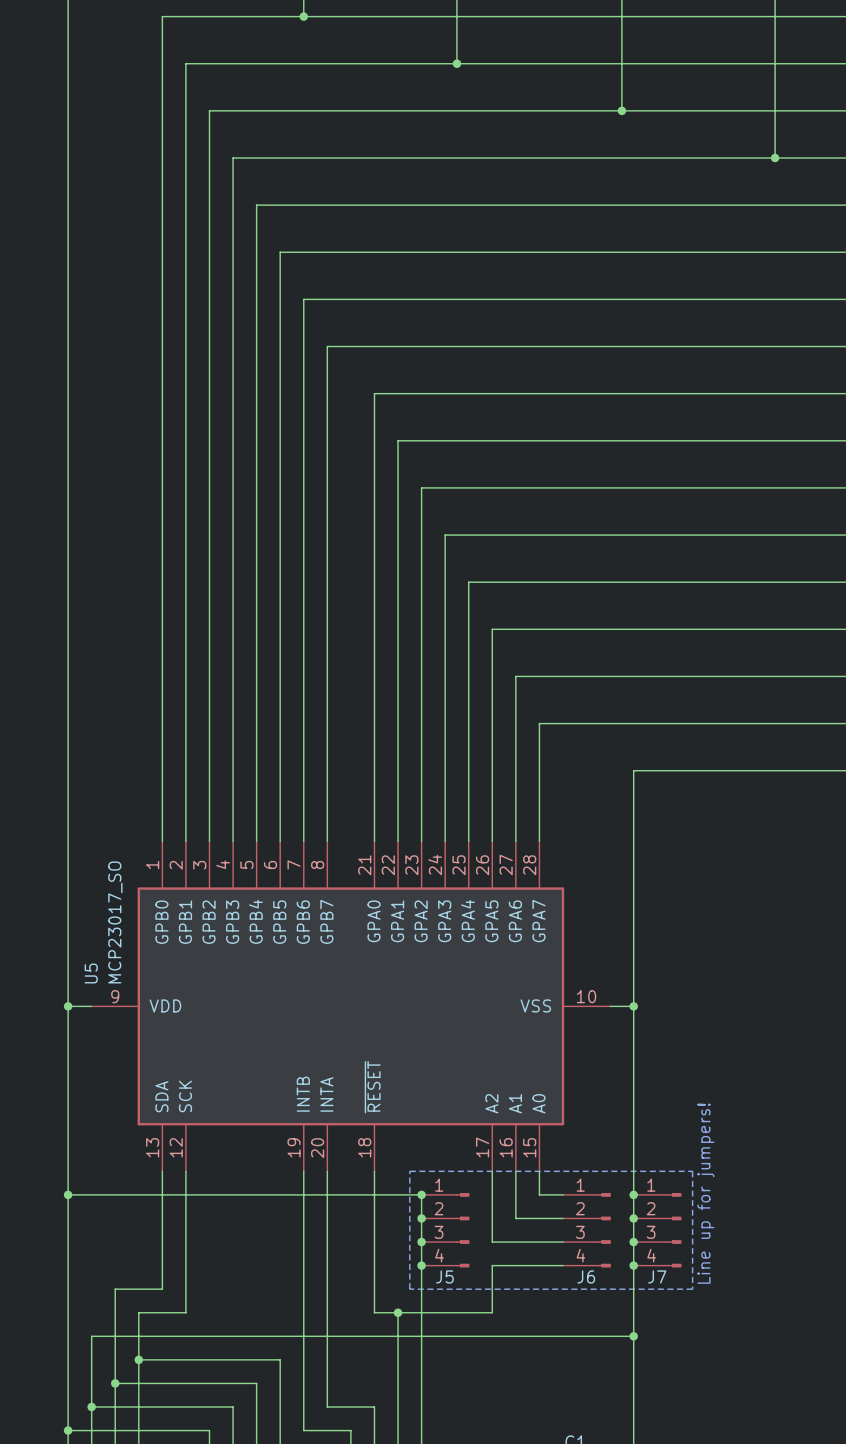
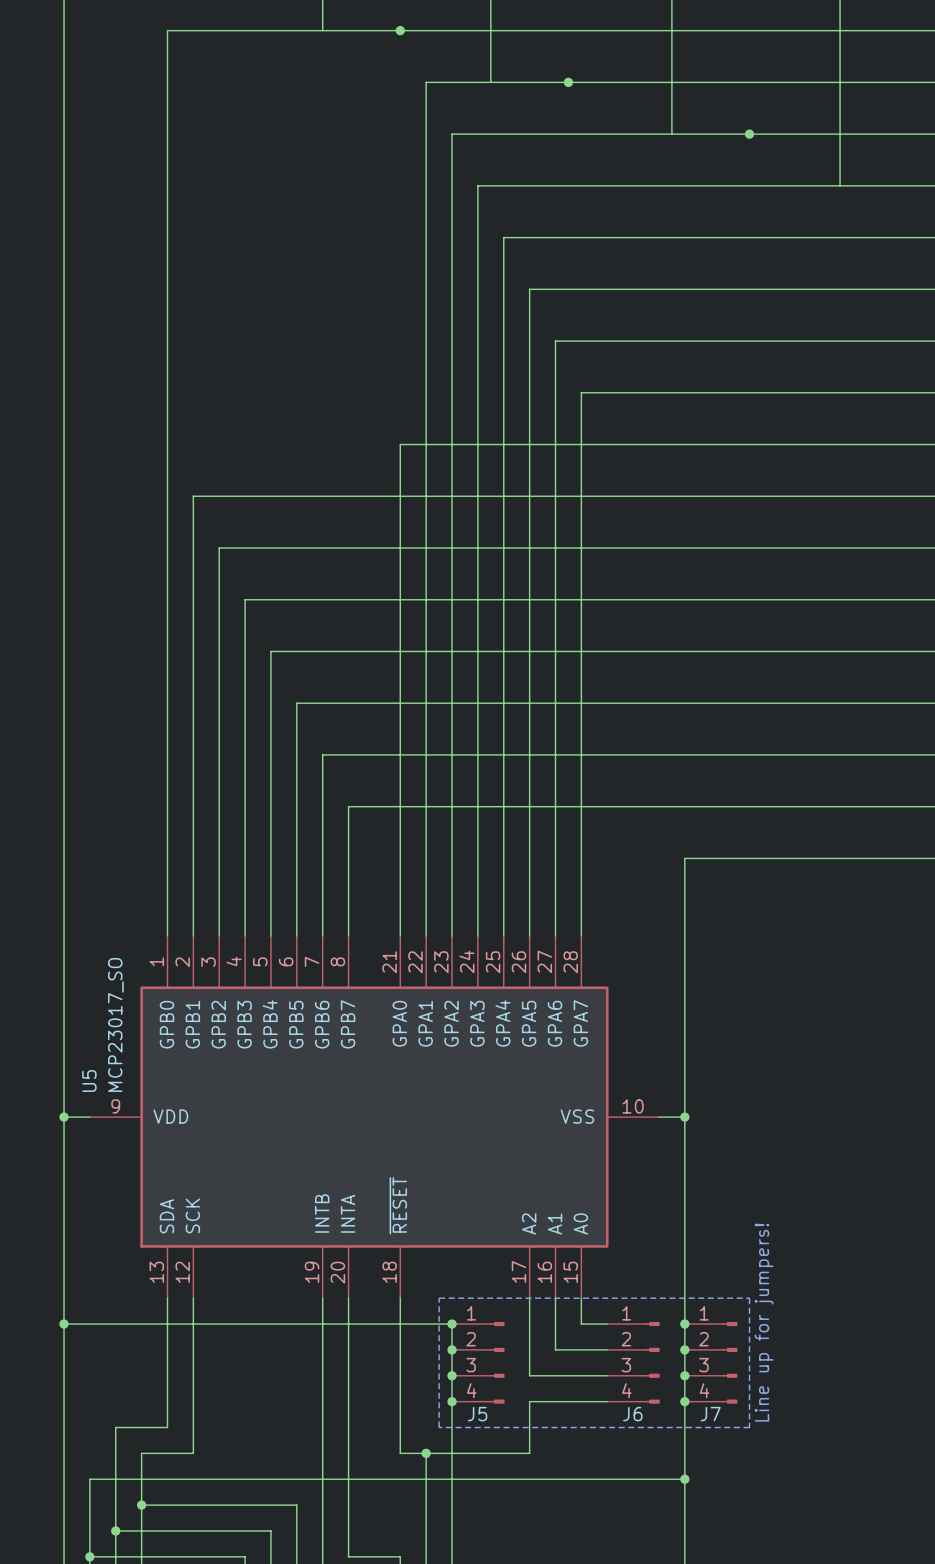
junction: (303, 16) -> none
junction: none -> (400, 30)
wire: (398, 63) (185, 63) (185, 440) -> (426, 82) (426, 496) (193, 496)
junction: (456, 63) -> none
junction: none -> (568, 82)
wire: (421, 110) (209, 110) (209, 487) -> (452, 134) (452, 548) (219, 548)
junction: (621, 110) -> none
junction: none -> (749, 134)
wire: (445, 157) (233, 157) (233, 535) -> (477, 185) (477, 599) (245, 599)
junction: (775, 157) -> none
wire: (468, 205) (256, 205) (256, 582) -> (503, 237) (503, 651) (270, 651)
wire: (492, 252) (280, 252) (280, 629) -> (529, 289) (529, 703) (296, 703)
wire: (515, 299) (303, 299) (303, 676) -> (555, 341) (555, 754) (322, 754)
wire: (539, 346) (327, 346) (327, 723) -> (581, 392) (581, 806) (348, 806)

